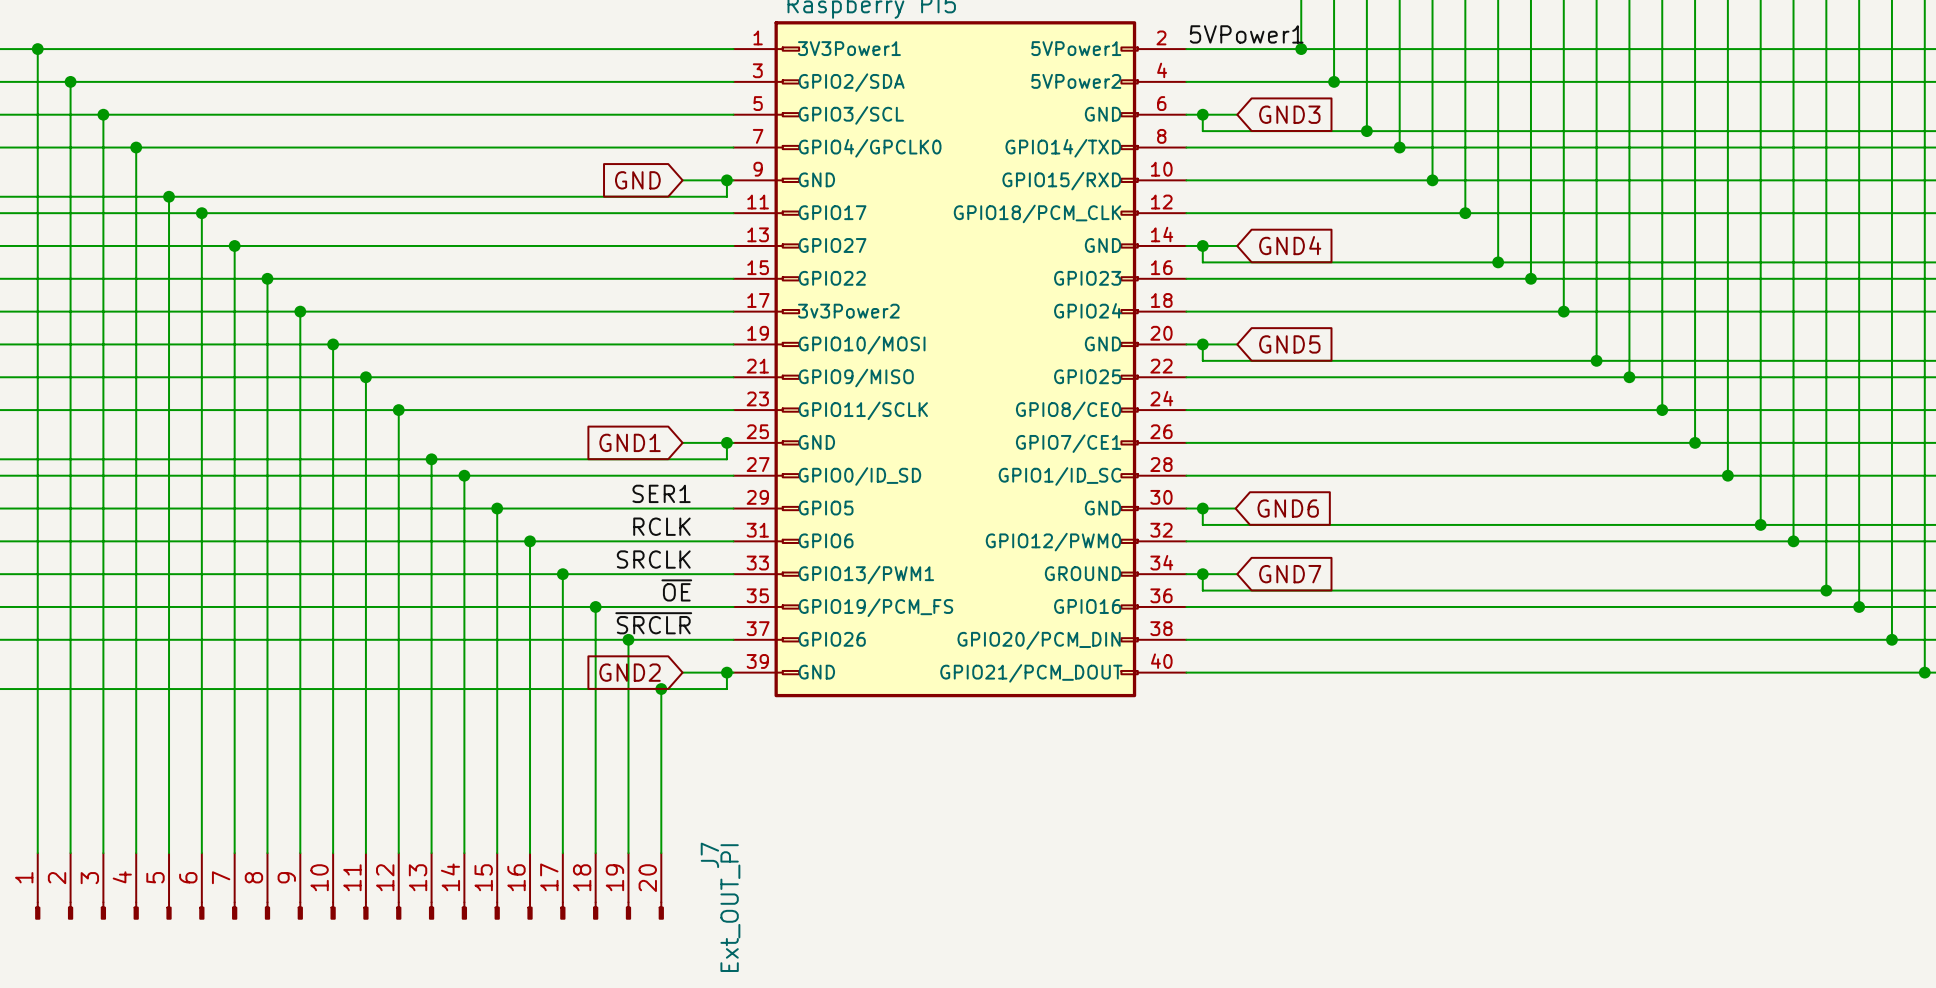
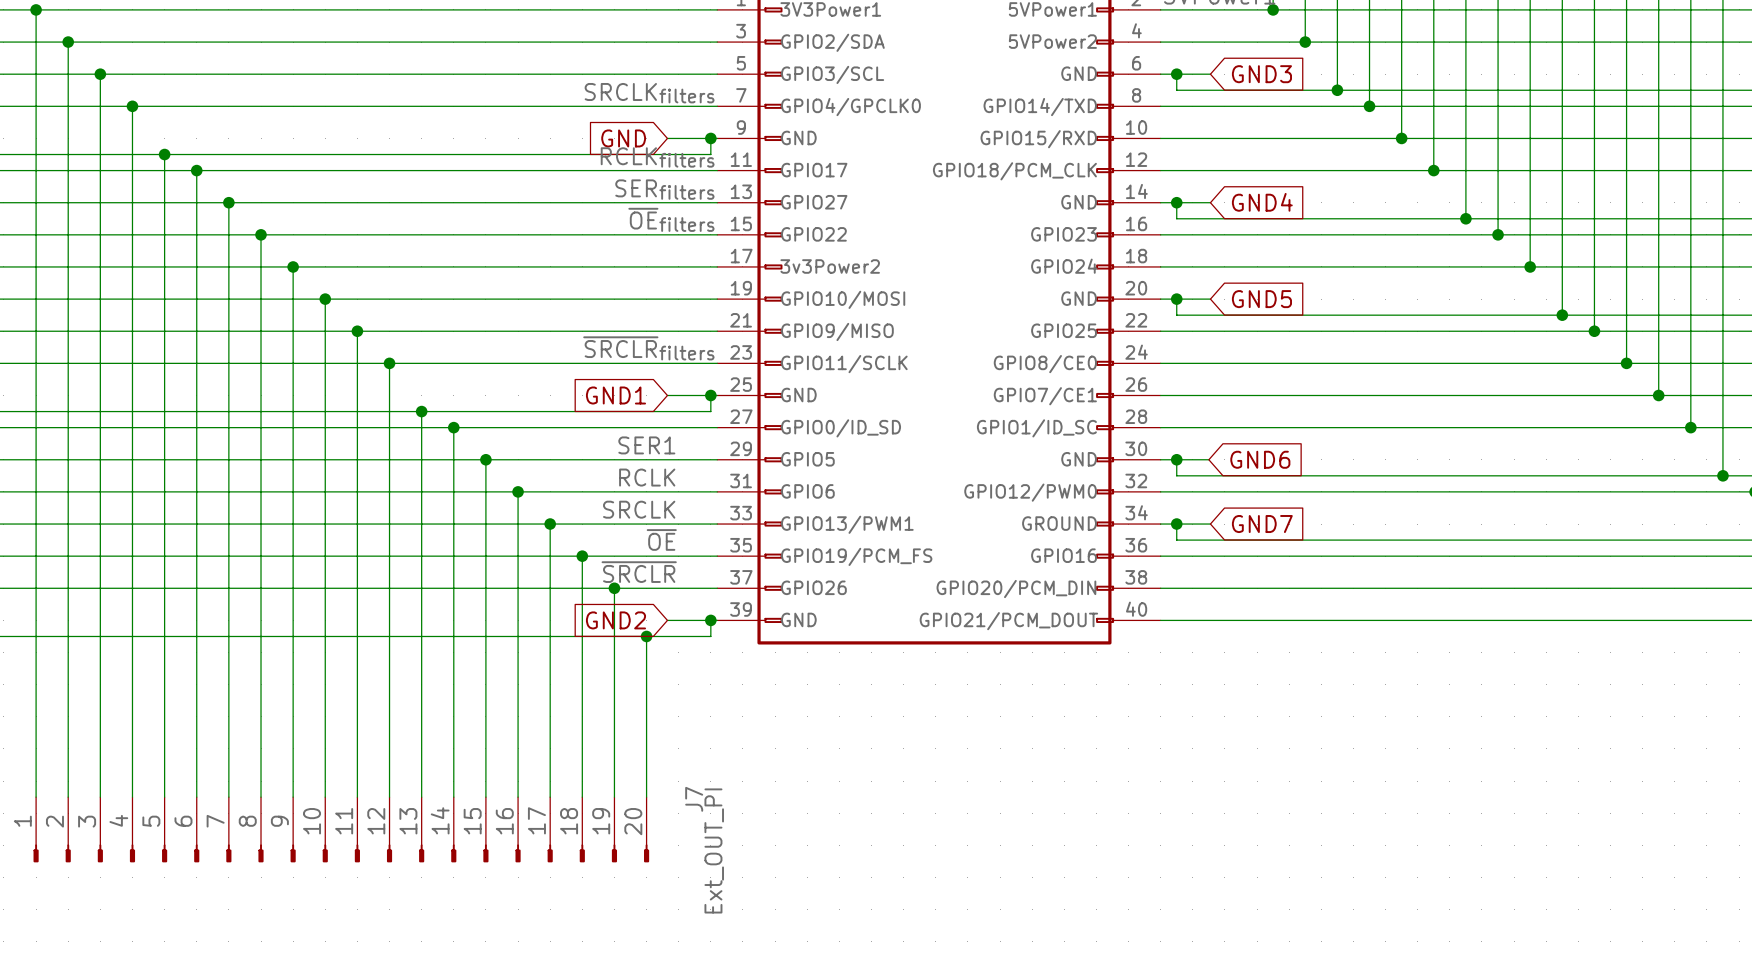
label: none -> SRCLKfilters (649, 93)
label: none -> RCLKfilters (657, 157)
label: none -> SERfilters (664, 189)
label: none -> ~{OE}filters (671, 219)
label: none -> ~{SRCLR}filters (648, 348)

